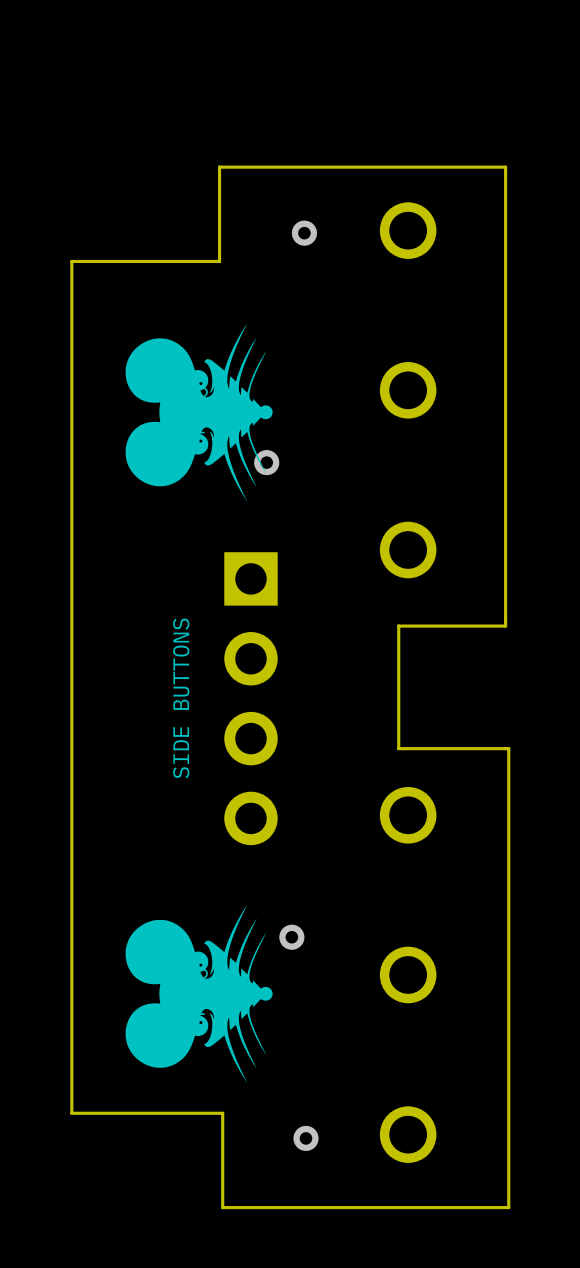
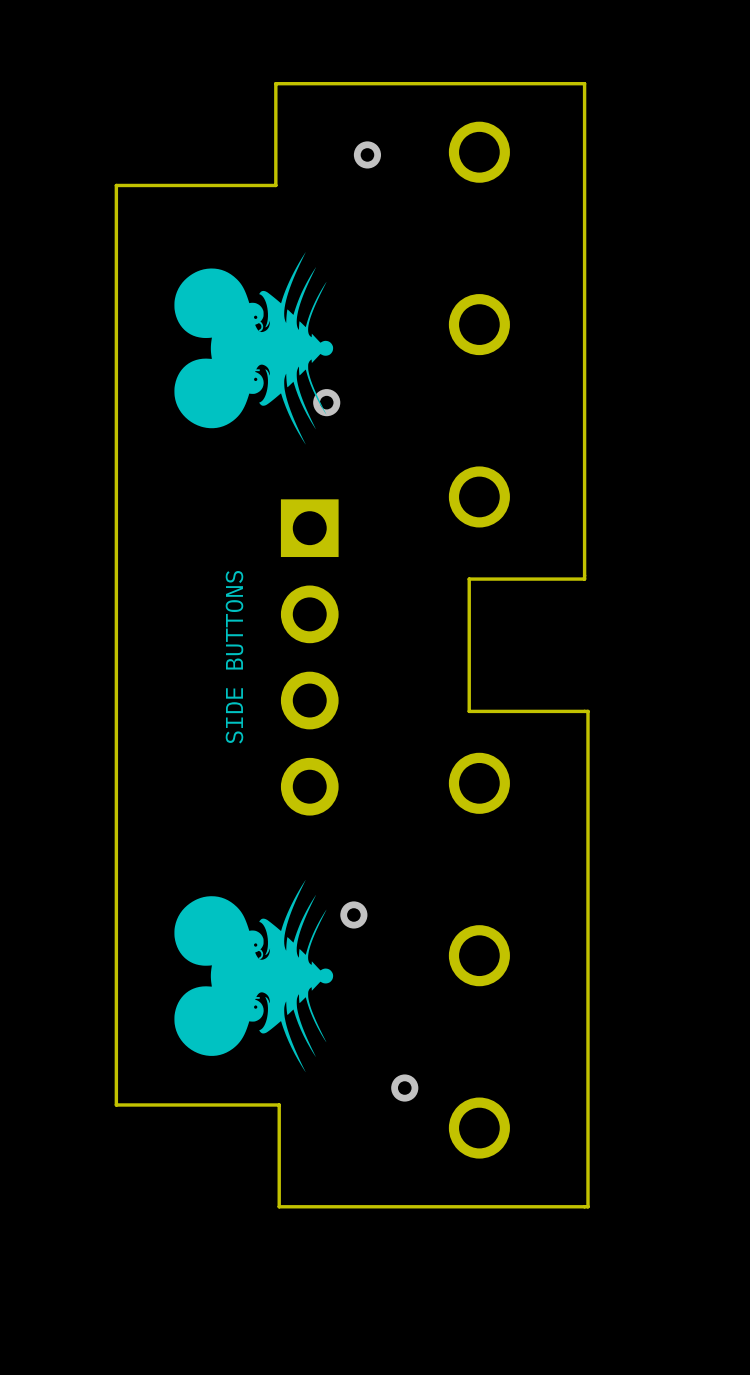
via position: (306, 1138) -> (404, 1088)

